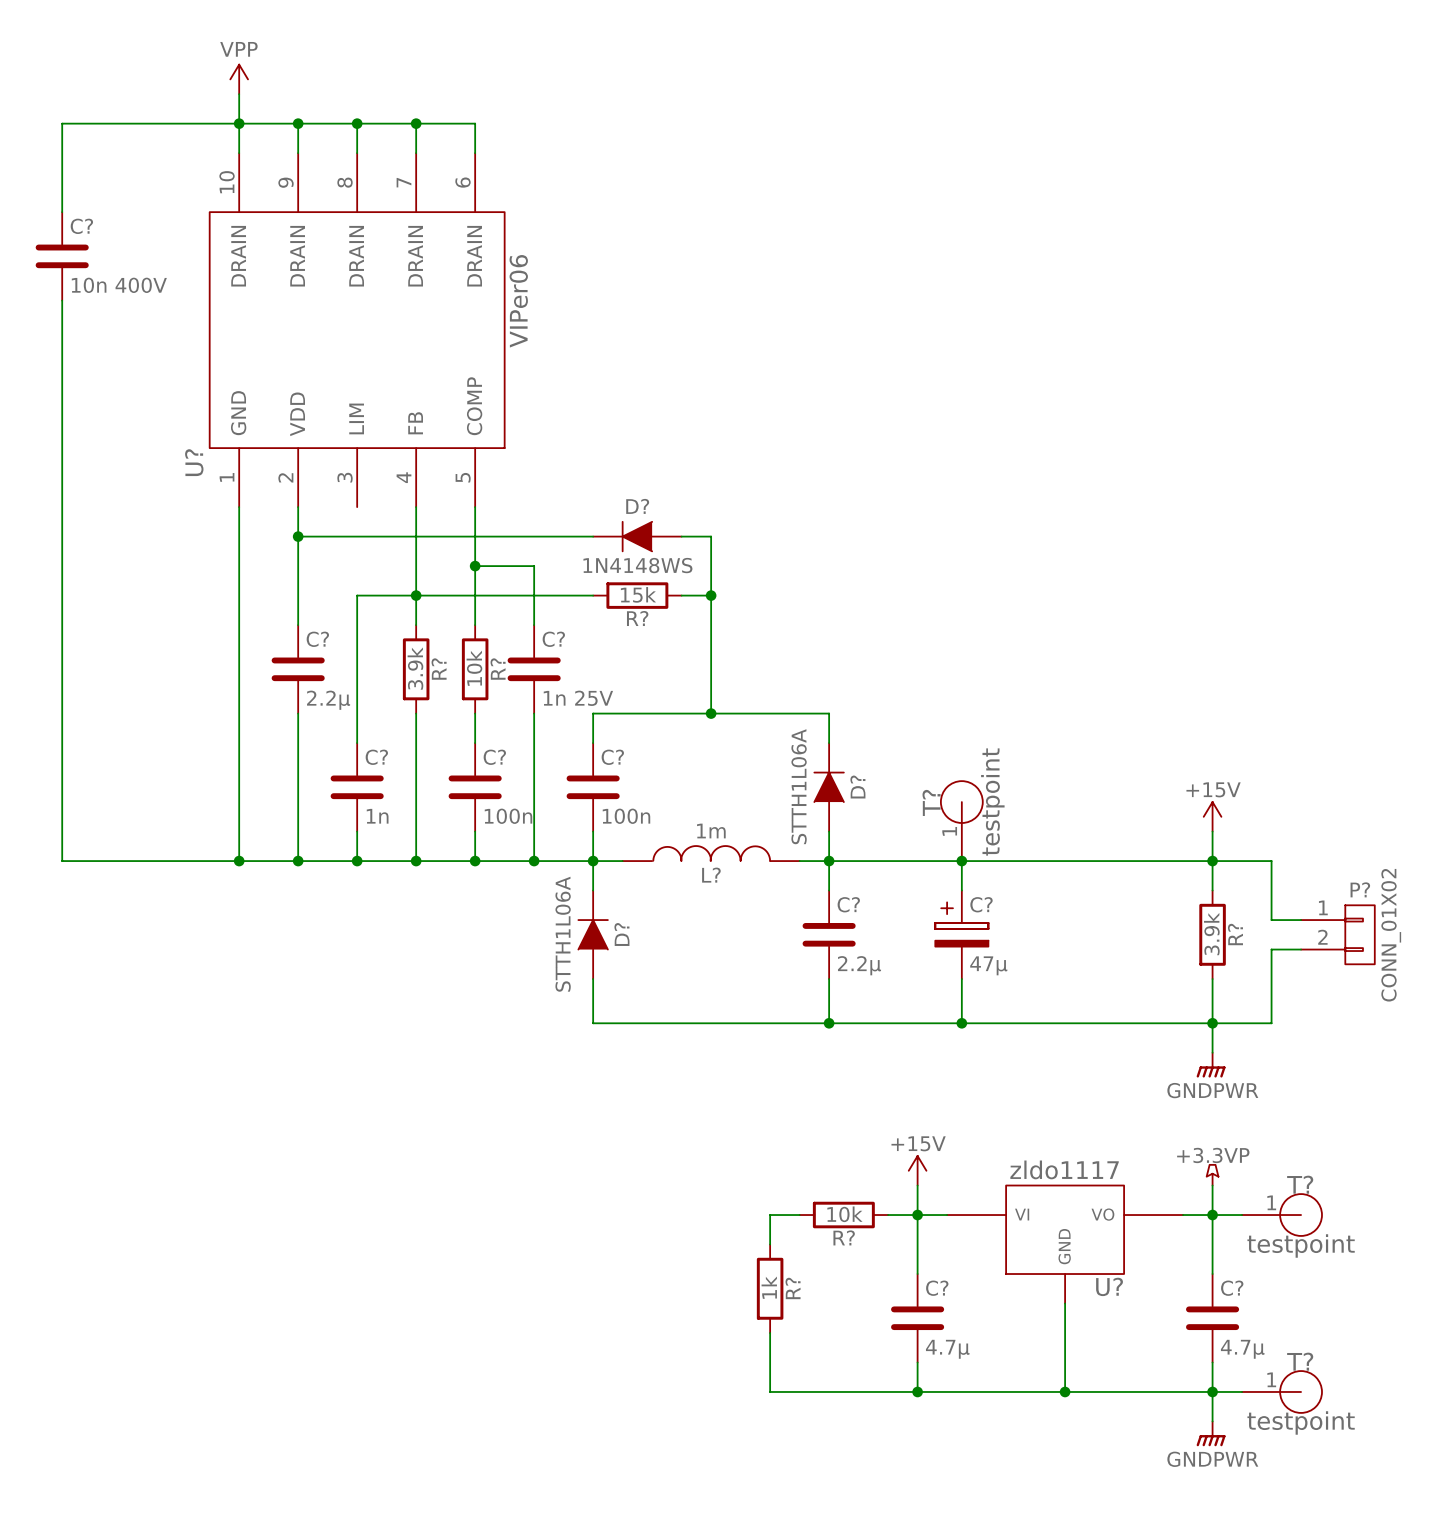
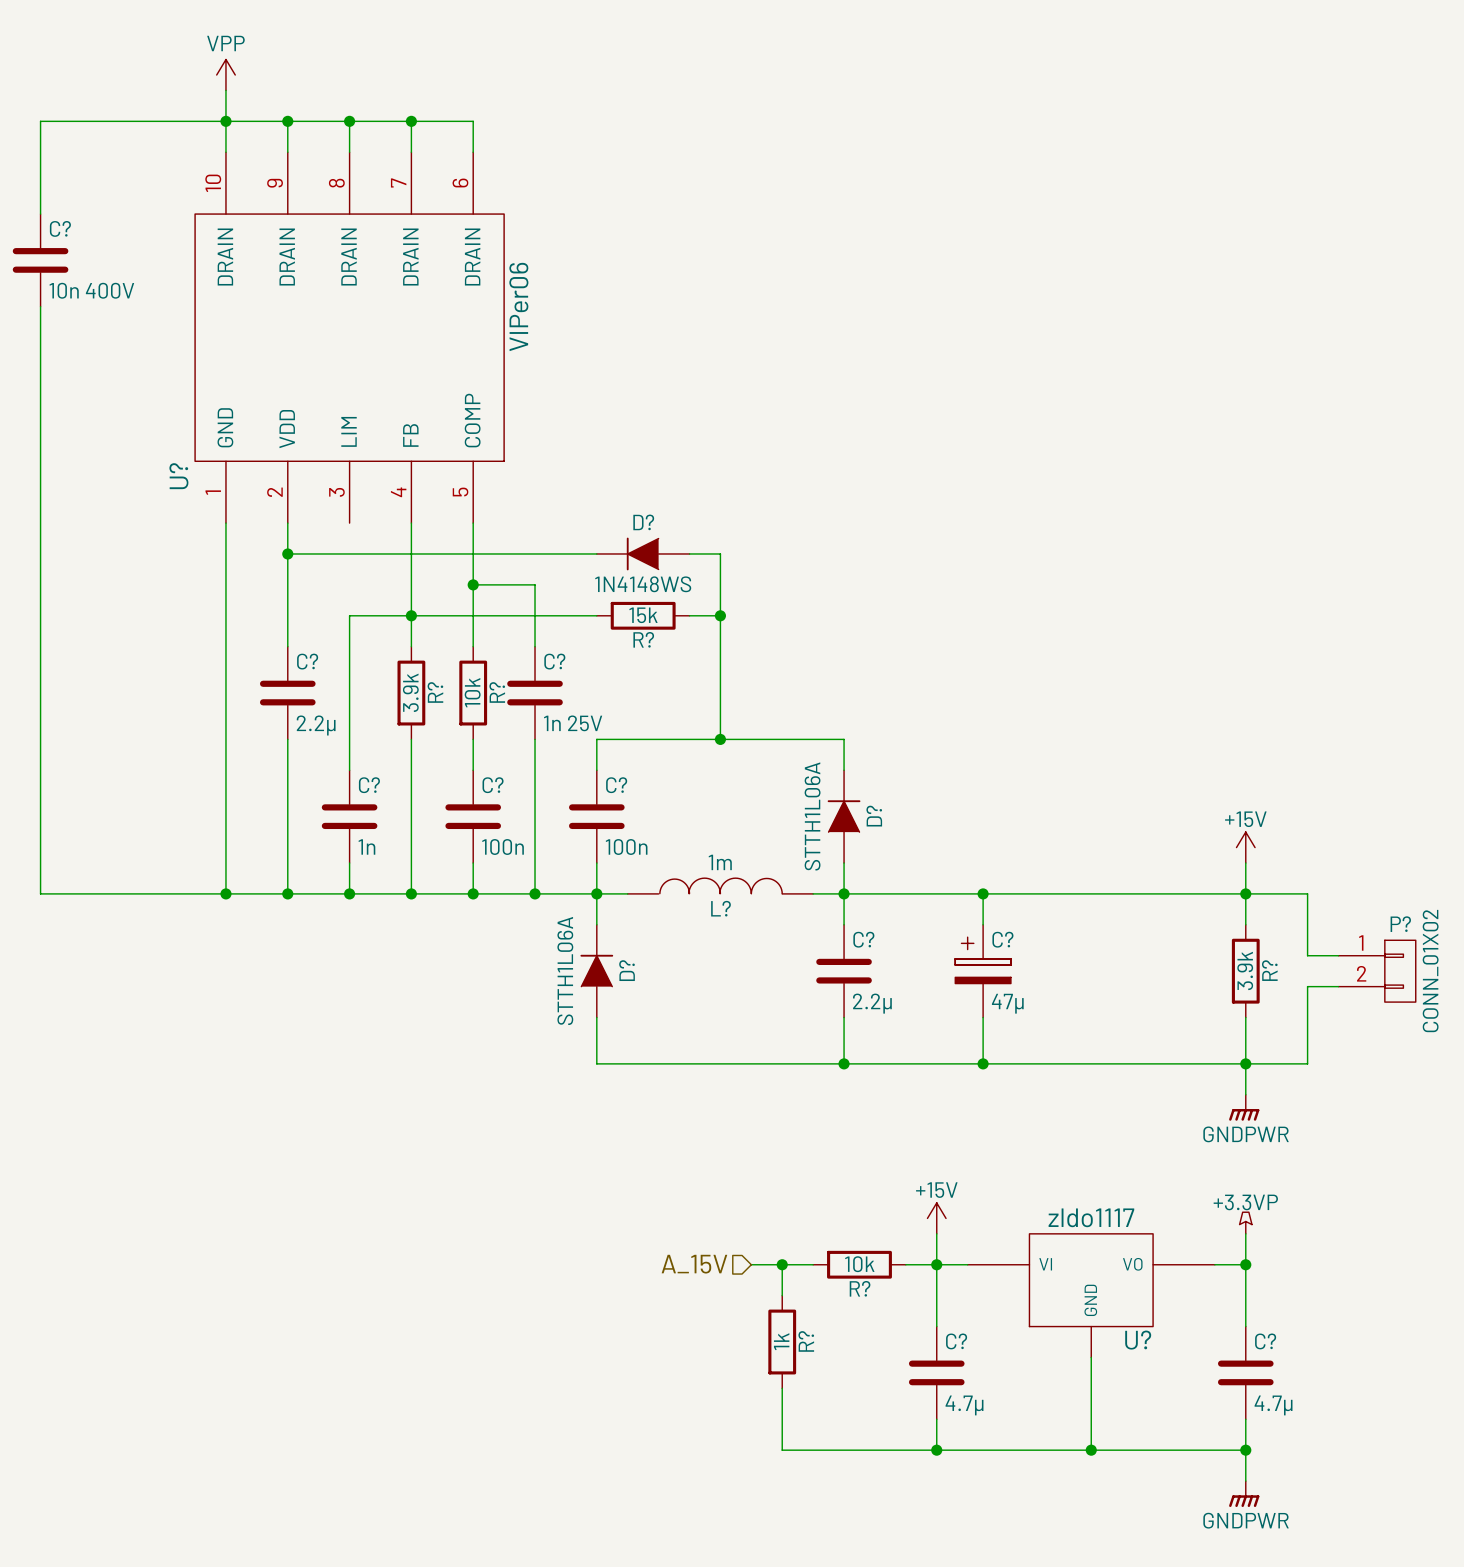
T?: testpoint (961, 821) -> none
wire: none -> (751, 1264) (782, 1264)
junction: none -> (782, 1264)
wire: (1212, 1215) (1242, 1215) -> none
T?: testpoint (1282, 1215) -> none
hierarchical label: none -> A_15V (694, 1264)
wire: (1212, 1391) (1242, 1391) -> none
T?: testpoint (1282, 1391) -> none

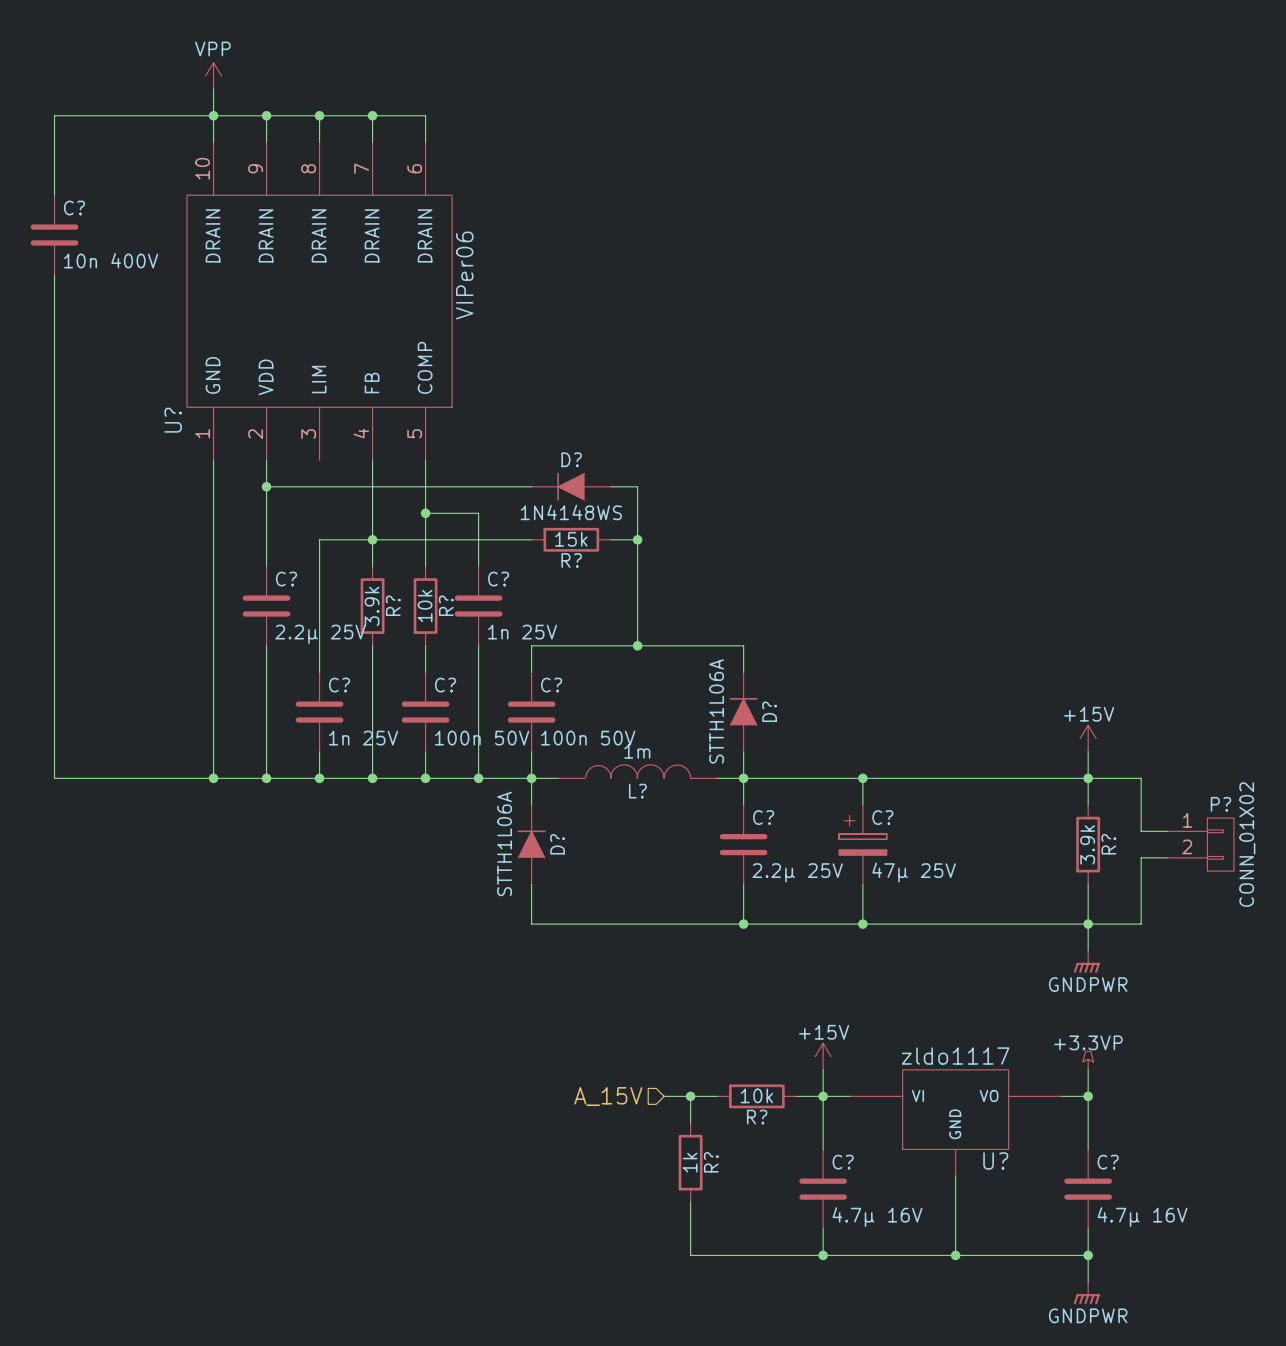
C? value: 2.2µ (316, 725) -> 2.2µ 25V (320, 634)
C? value: 1n (366, 846) -> 1n 25V (363, 738)
C? value: 100n (503, 847) -> 100n 50V (482, 738)
C? value: 100n (626, 847) -> 100n 50V (588, 738)
C? value: 2.2µ (872, 1003) -> 2.2µ 25V (797, 872)
C? value: 47µ (1007, 1003) -> 47µ 25V (914, 872)
C? value: 4.7µ (964, 1405) -> 4.7µ 16V (877, 1217)
C? value: 4.7µ (1273, 1405) -> 4.7µ 16V (1142, 1217)

